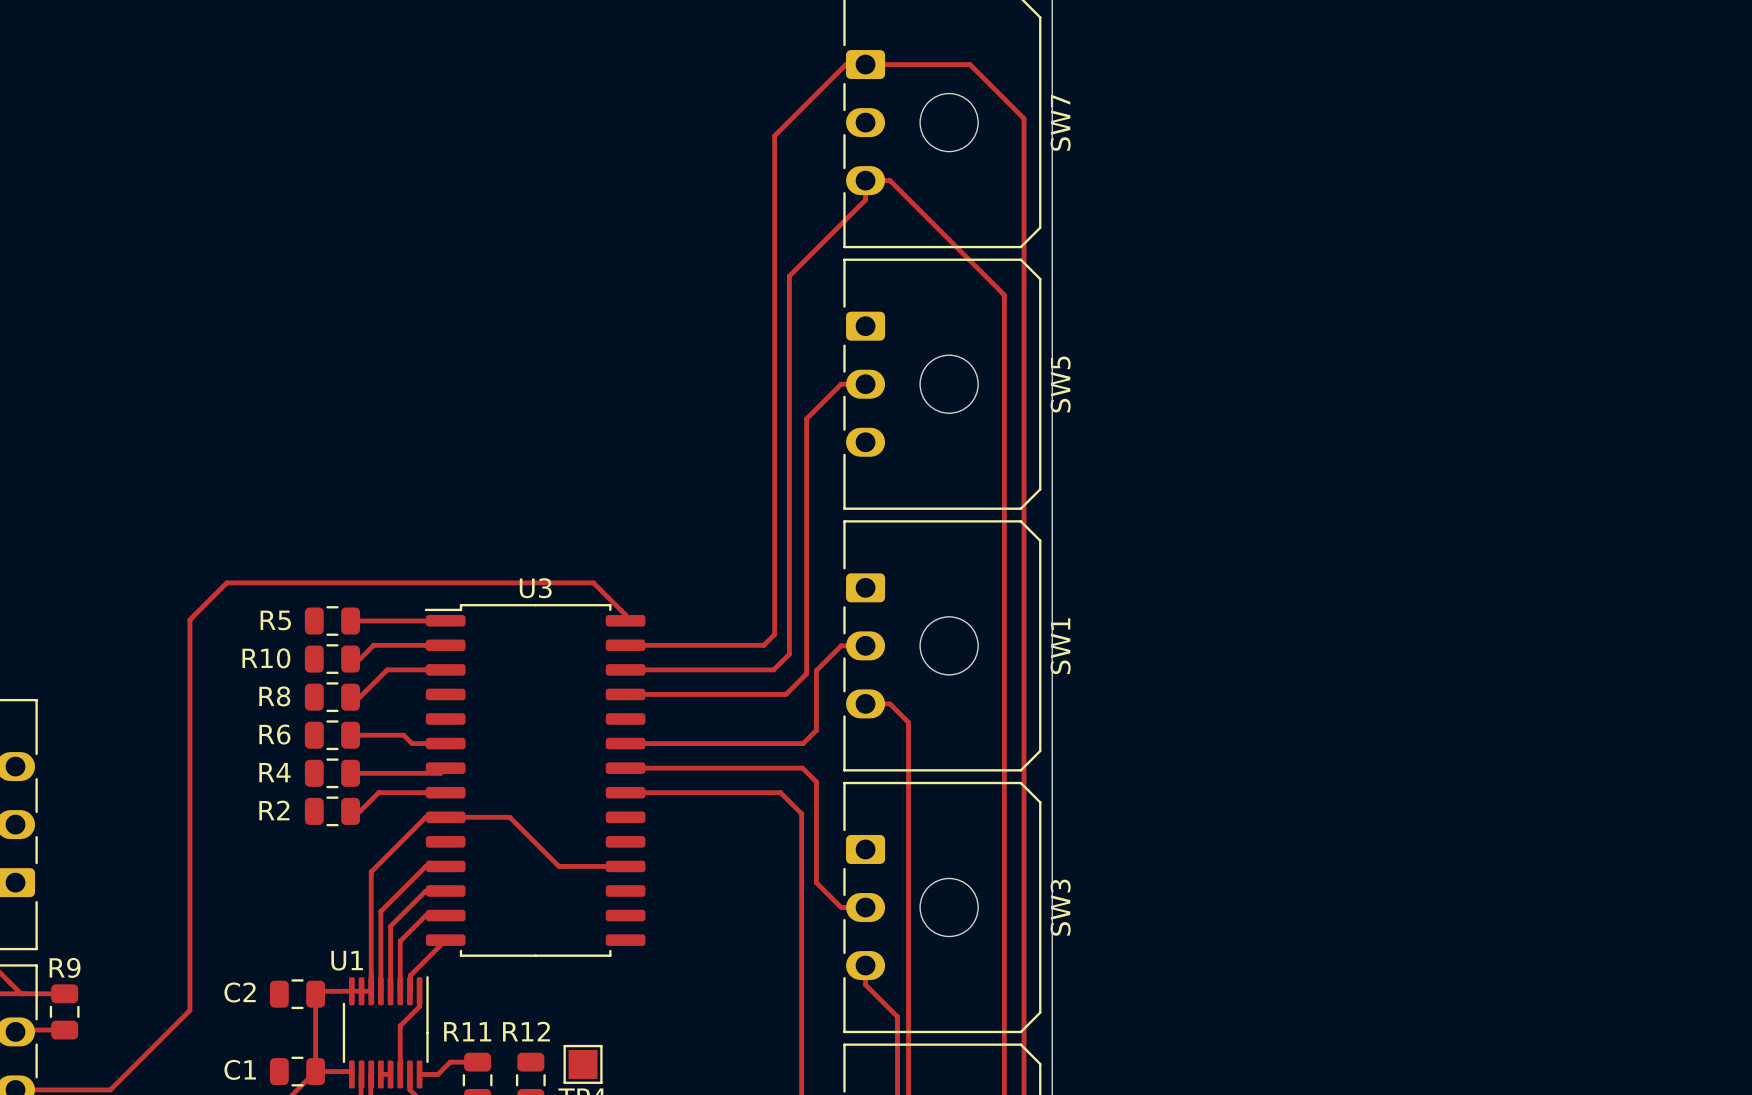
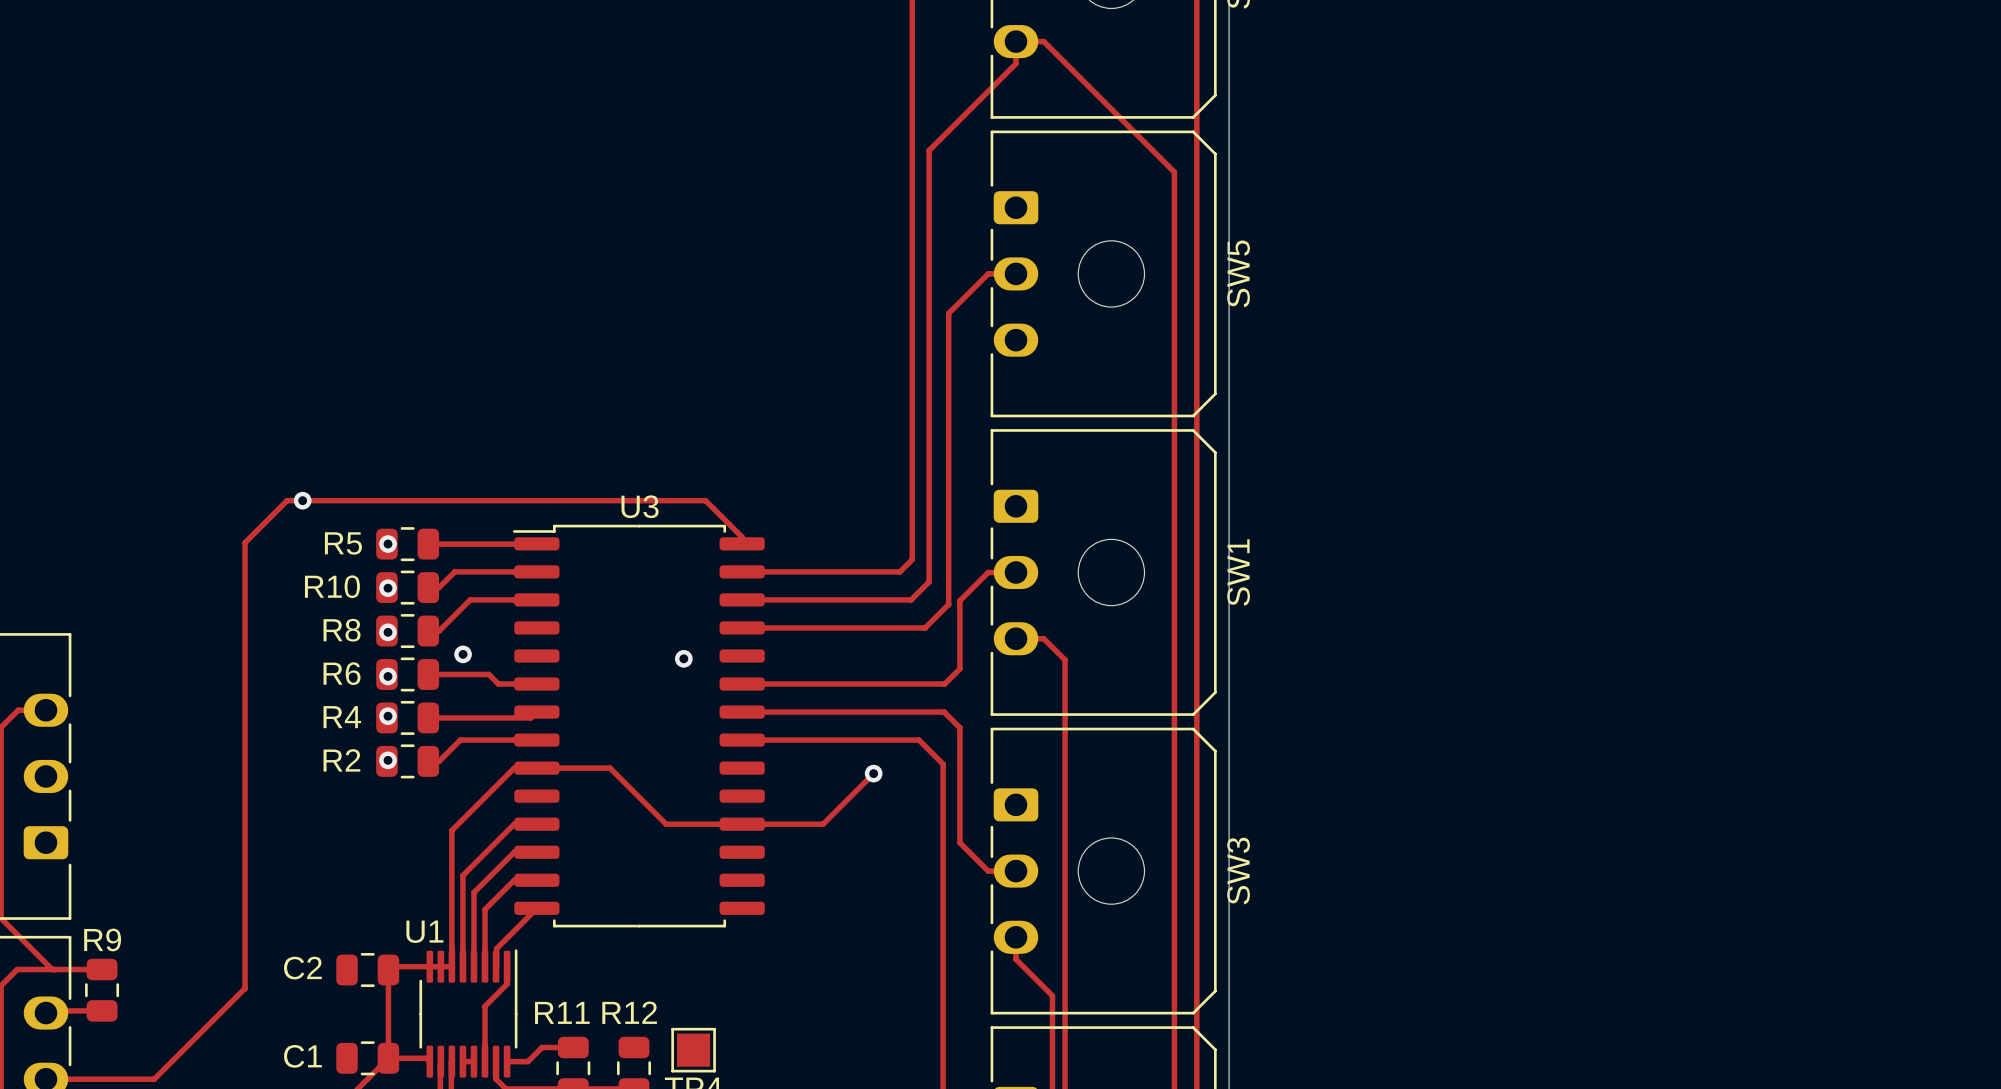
via: none -> (302, 500)
via: none -> (388, 544)
via: none -> (388, 588)
via: none -> (388, 632)
via: none -> (463, 654)
via: none -> (683, 658)
via: none -> (388, 676)
via: none -> (388, 716)
via: none -> (388, 760)
track: none -> (873, 773) (823, 824) (742, 824)
via: none -> (873, 773)

